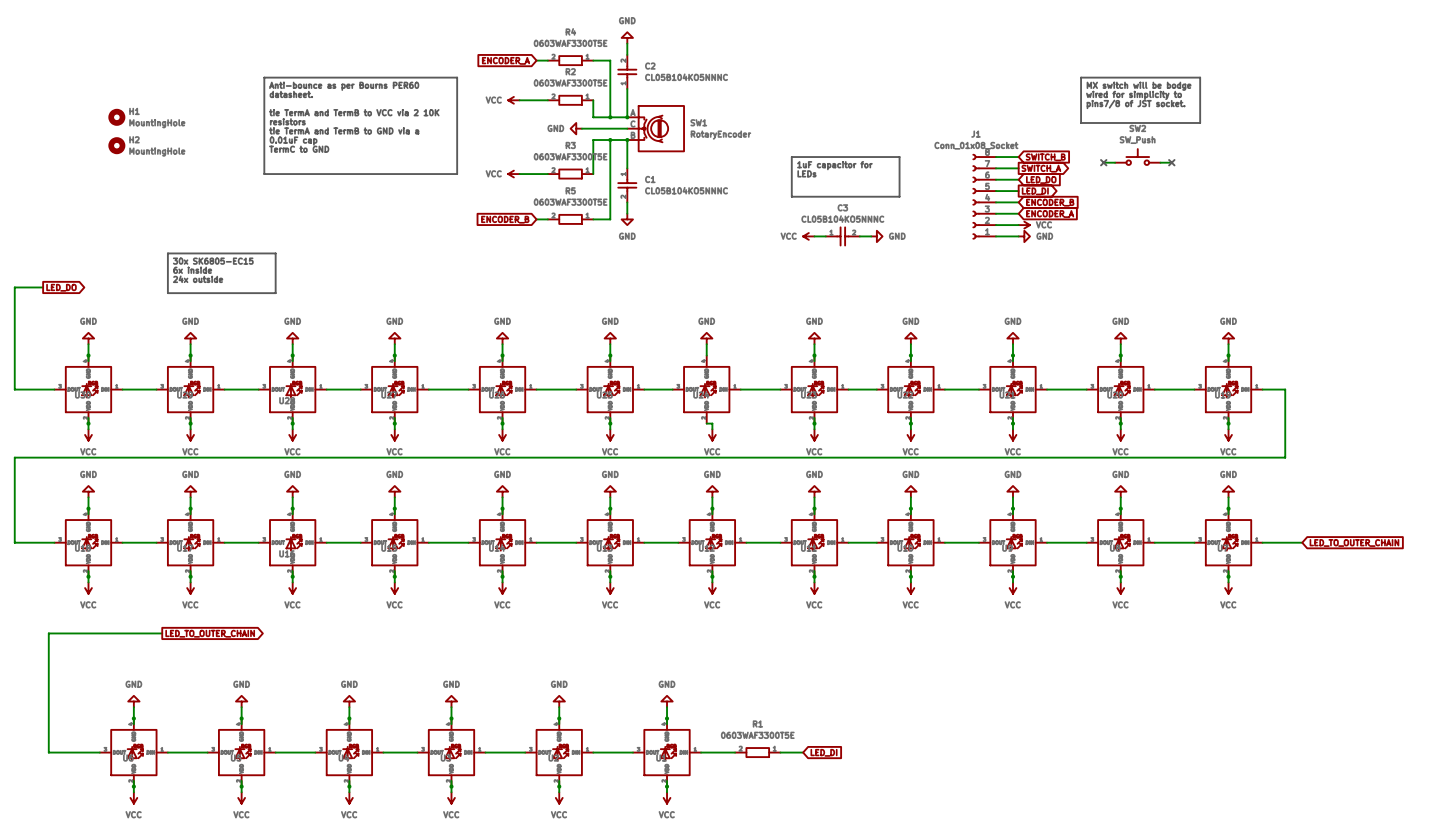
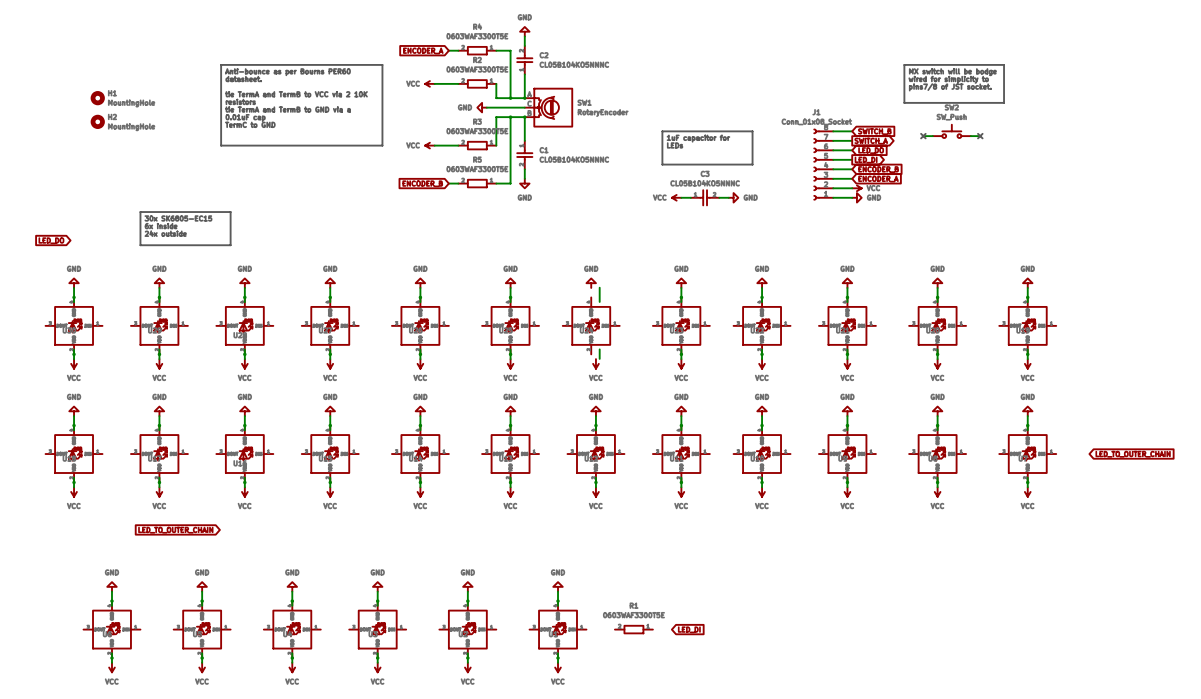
wire: (43, 287) (14, 287) (14, 389) (54, 389) -> none
wire: none -> (599, 287) (599, 301)
wire: (706, 344) (706, 355) -> (599, 349) (599, 358)
wire: (122, 389) (156, 389) -> none
wire: (224, 389) (258, 389) -> none
wire: (326, 389) (360, 389) -> none
wire: (428, 389) (468, 389) -> none
wire: (536, 389) (576, 389) -> none
wire: (644, 389) (672, 389) -> none
wire: (740, 389) (780, 389) -> none
wire: (848, 389) (876, 389) -> none
wire: (944, 389) (978, 389) -> none
wire: (1047, 389) (1086, 389) -> none
wire: (1154, 389) (1194, 389) -> none
wire: (1262, 389) (1285, 389) (1285, 457) (14, 457) (14, 542) (54, 542) -> none
wire: (706, 423) (712, 423) (712, 429) -> none
wire: (122, 542) (156, 542) -> none
wire: (224, 542) (258, 542) -> none
wire: (326, 542) (360, 542) -> none
wire: (428, 542) (468, 542) -> none
wire: (536, 542) (576, 542) -> none
wire: (644, 542) (678, 542) -> none
wire: (746, 542) (780, 542) -> none
wire: (848, 542) (876, 542) -> none
wire: (944, 542) (978, 542) -> none
wire: (1047, 542) (1086, 542) -> none
wire: (1154, 542) (1194, 542) -> none
wire: (1262, 542) (1302, 542) -> none
wire: (162, 633) (48, 633) (48, 752) (99, 752) -> none
wire: (167, 752) (207, 752) -> none
wire: (275, 752) (315, 752) -> none
wire: (383, 752) (417, 752) -> none
wire: (485, 752) (525, 752) -> none
wire: (593, 752) (632, 752) -> none
wire: (701, 752) (735, 752) -> none
wire: (780, 752) (803, 752) -> none

